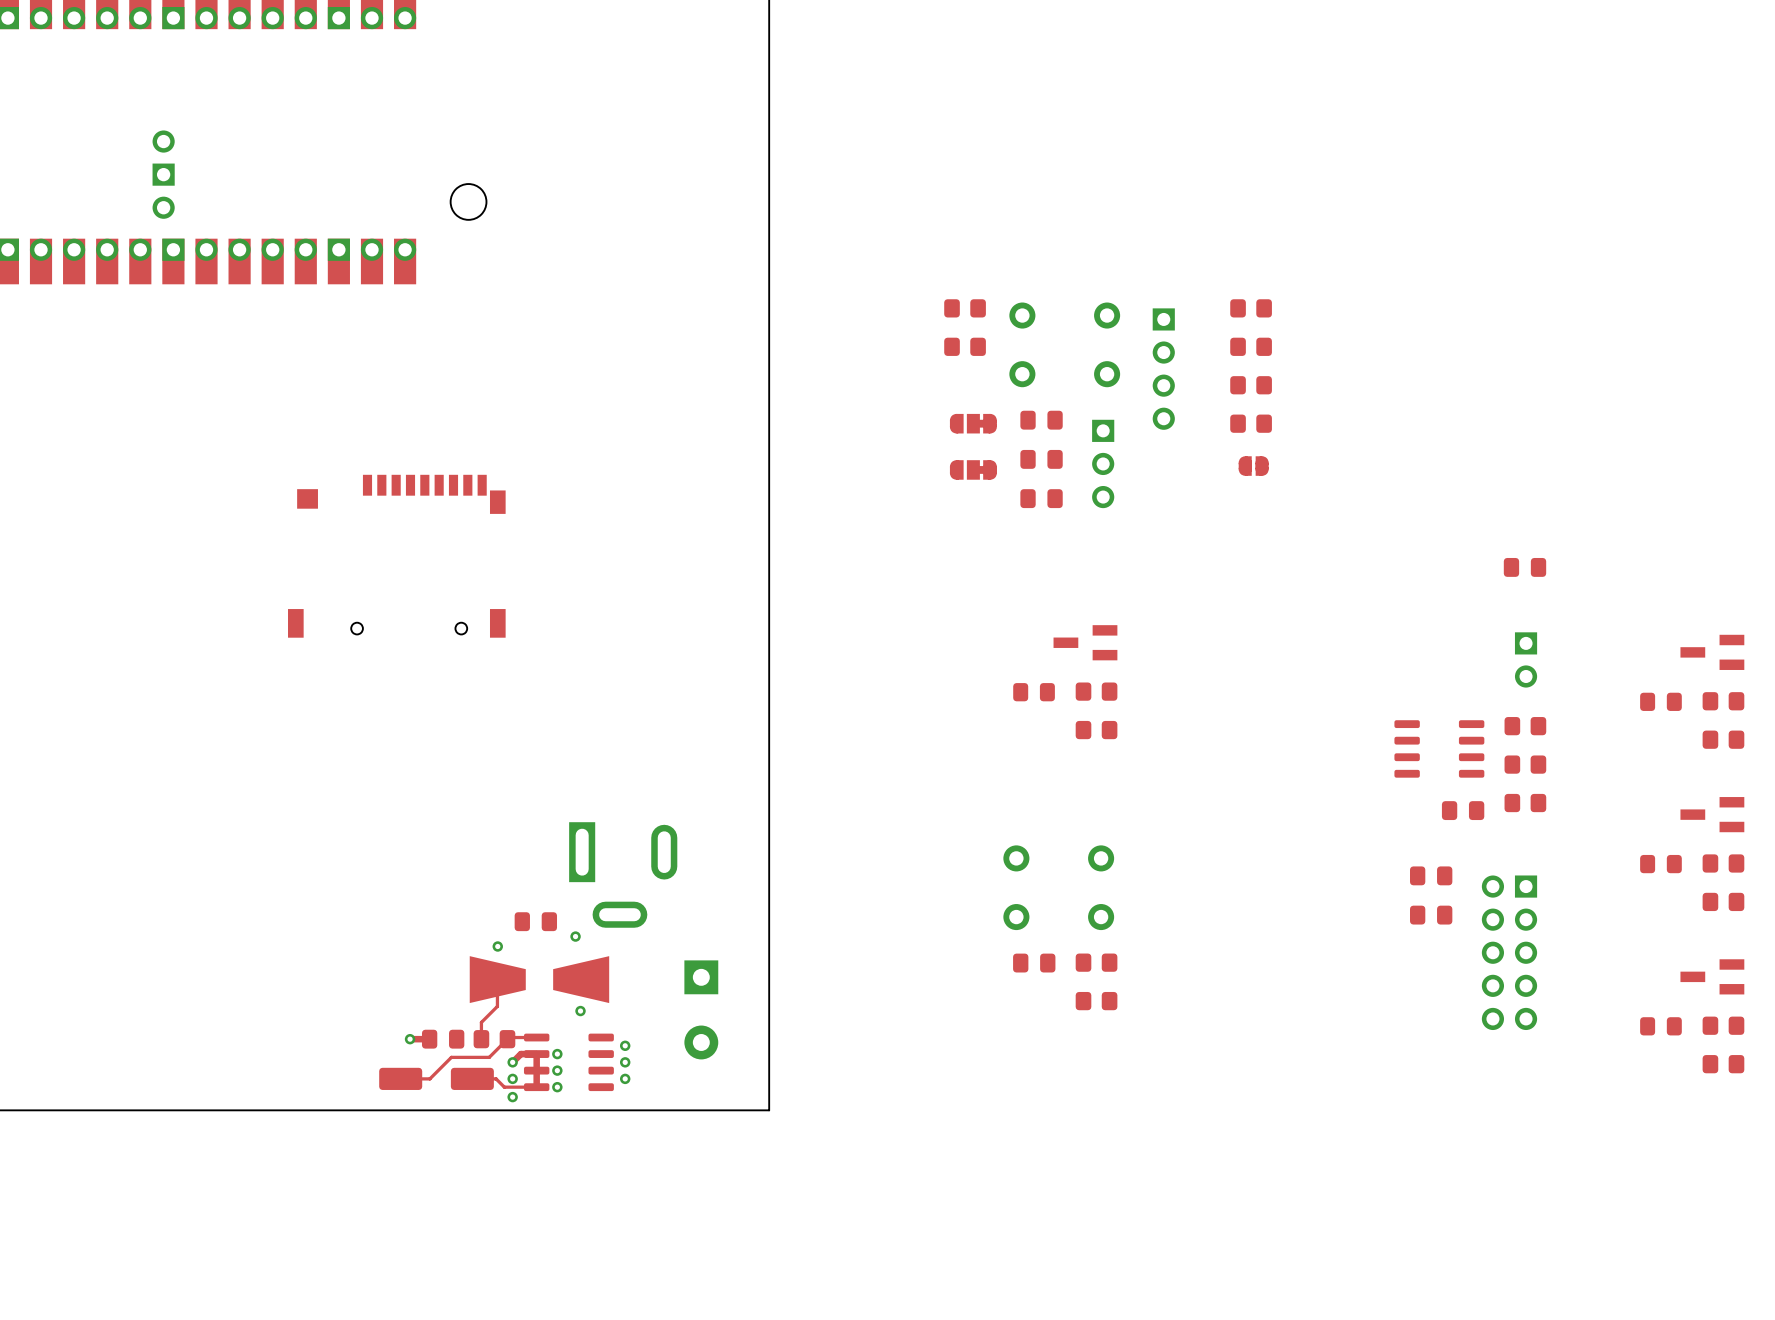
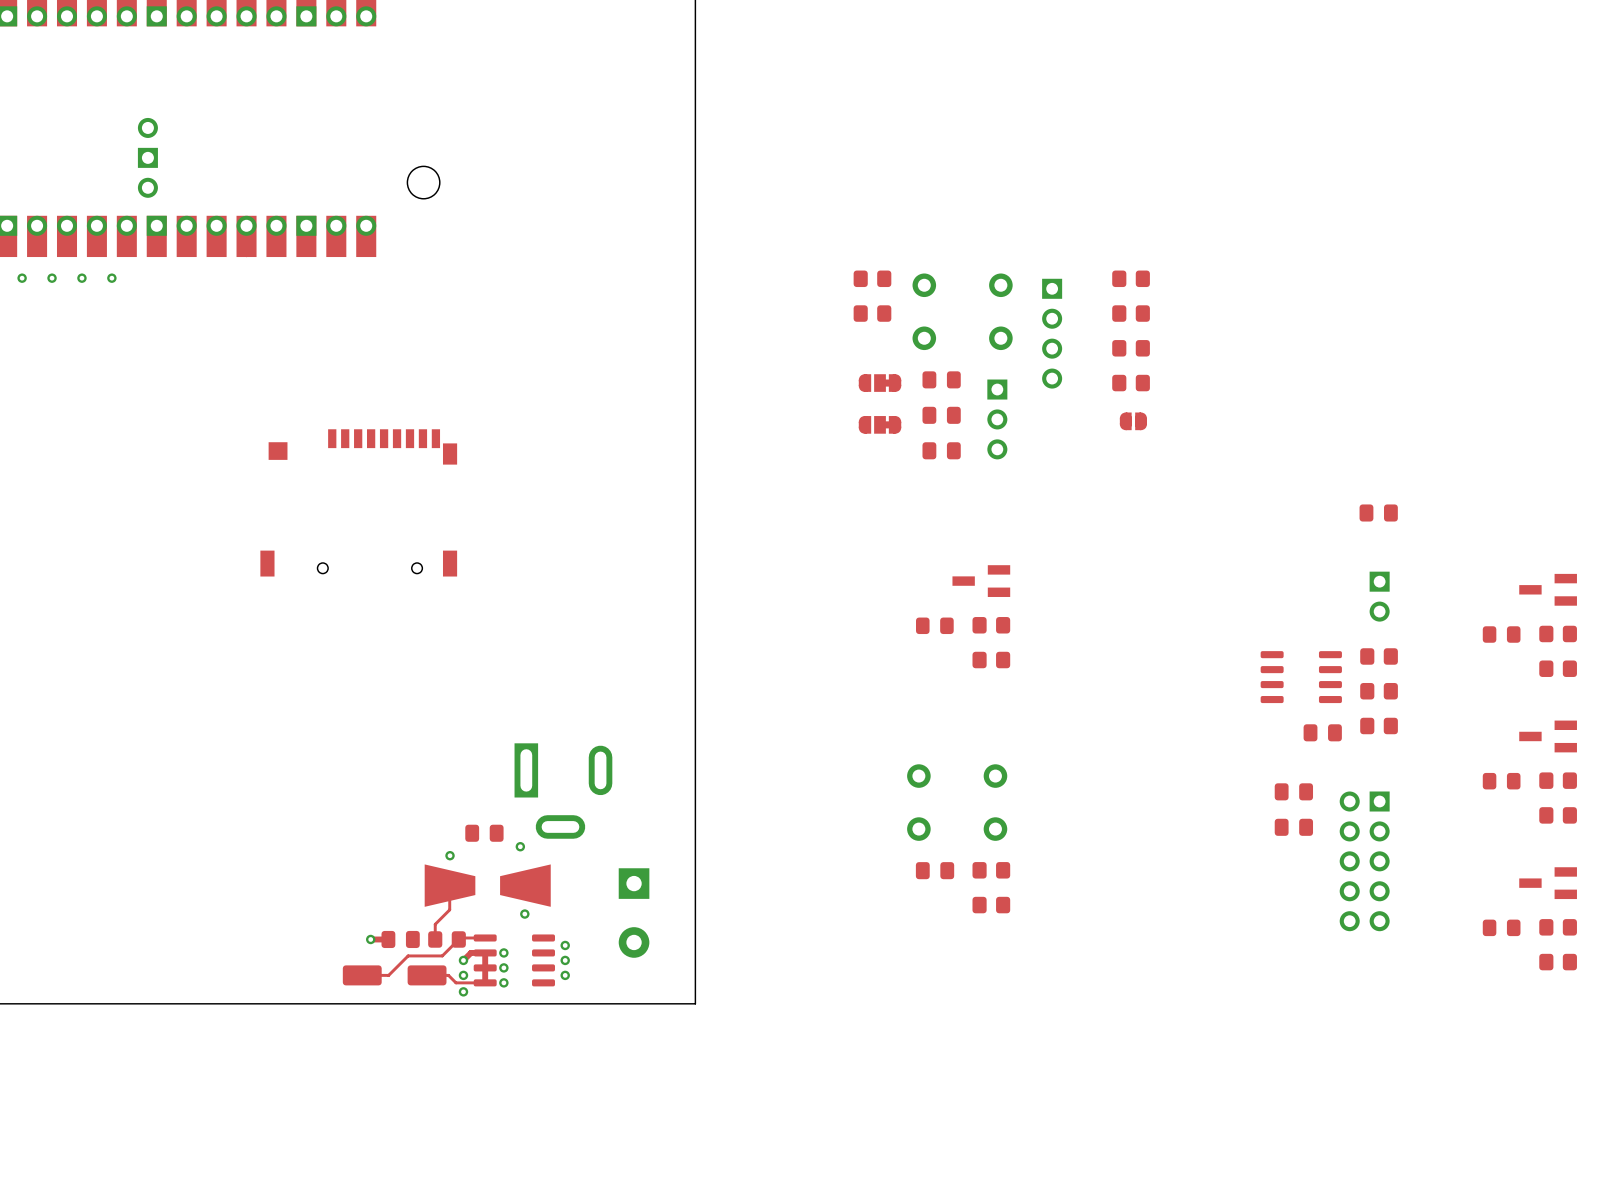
via: none -> (22, 278)
via: none -> (52, 278)
via: none -> (81, 278)
via: none -> (111, 278)

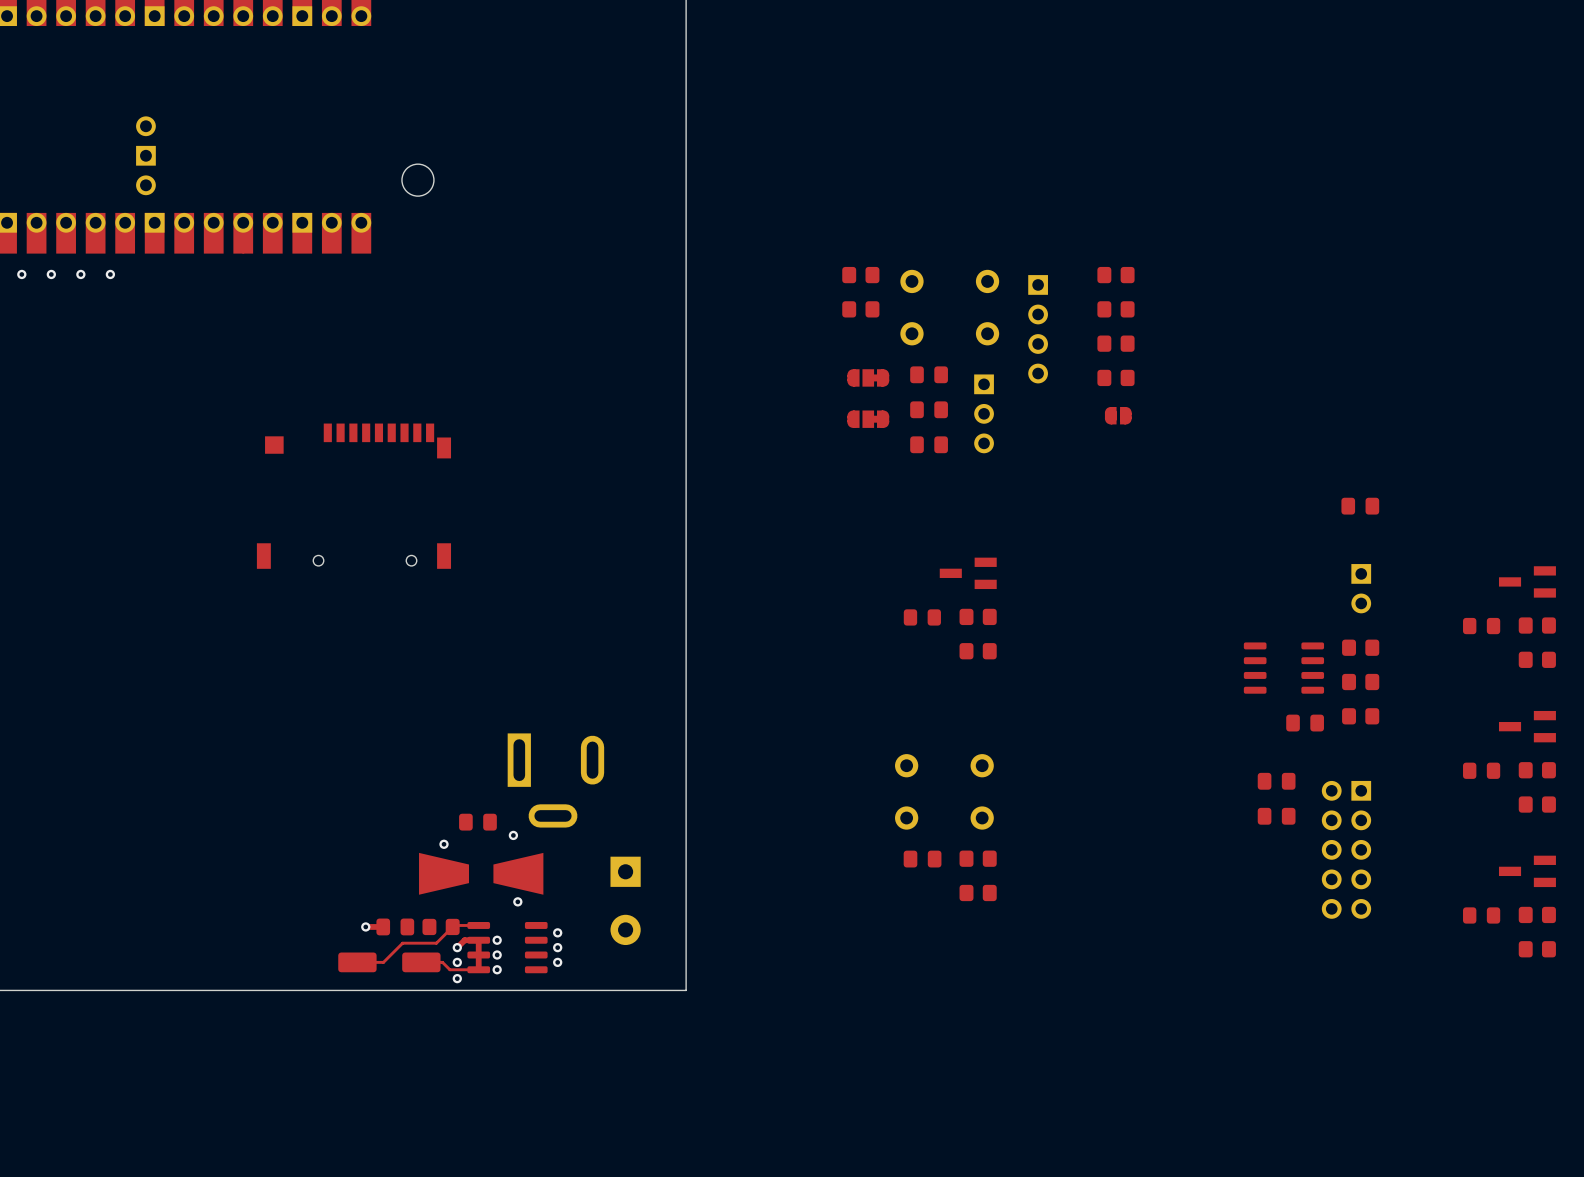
top track: (449, 885) (449, 909) (435, 924) (435, 939) -> none

